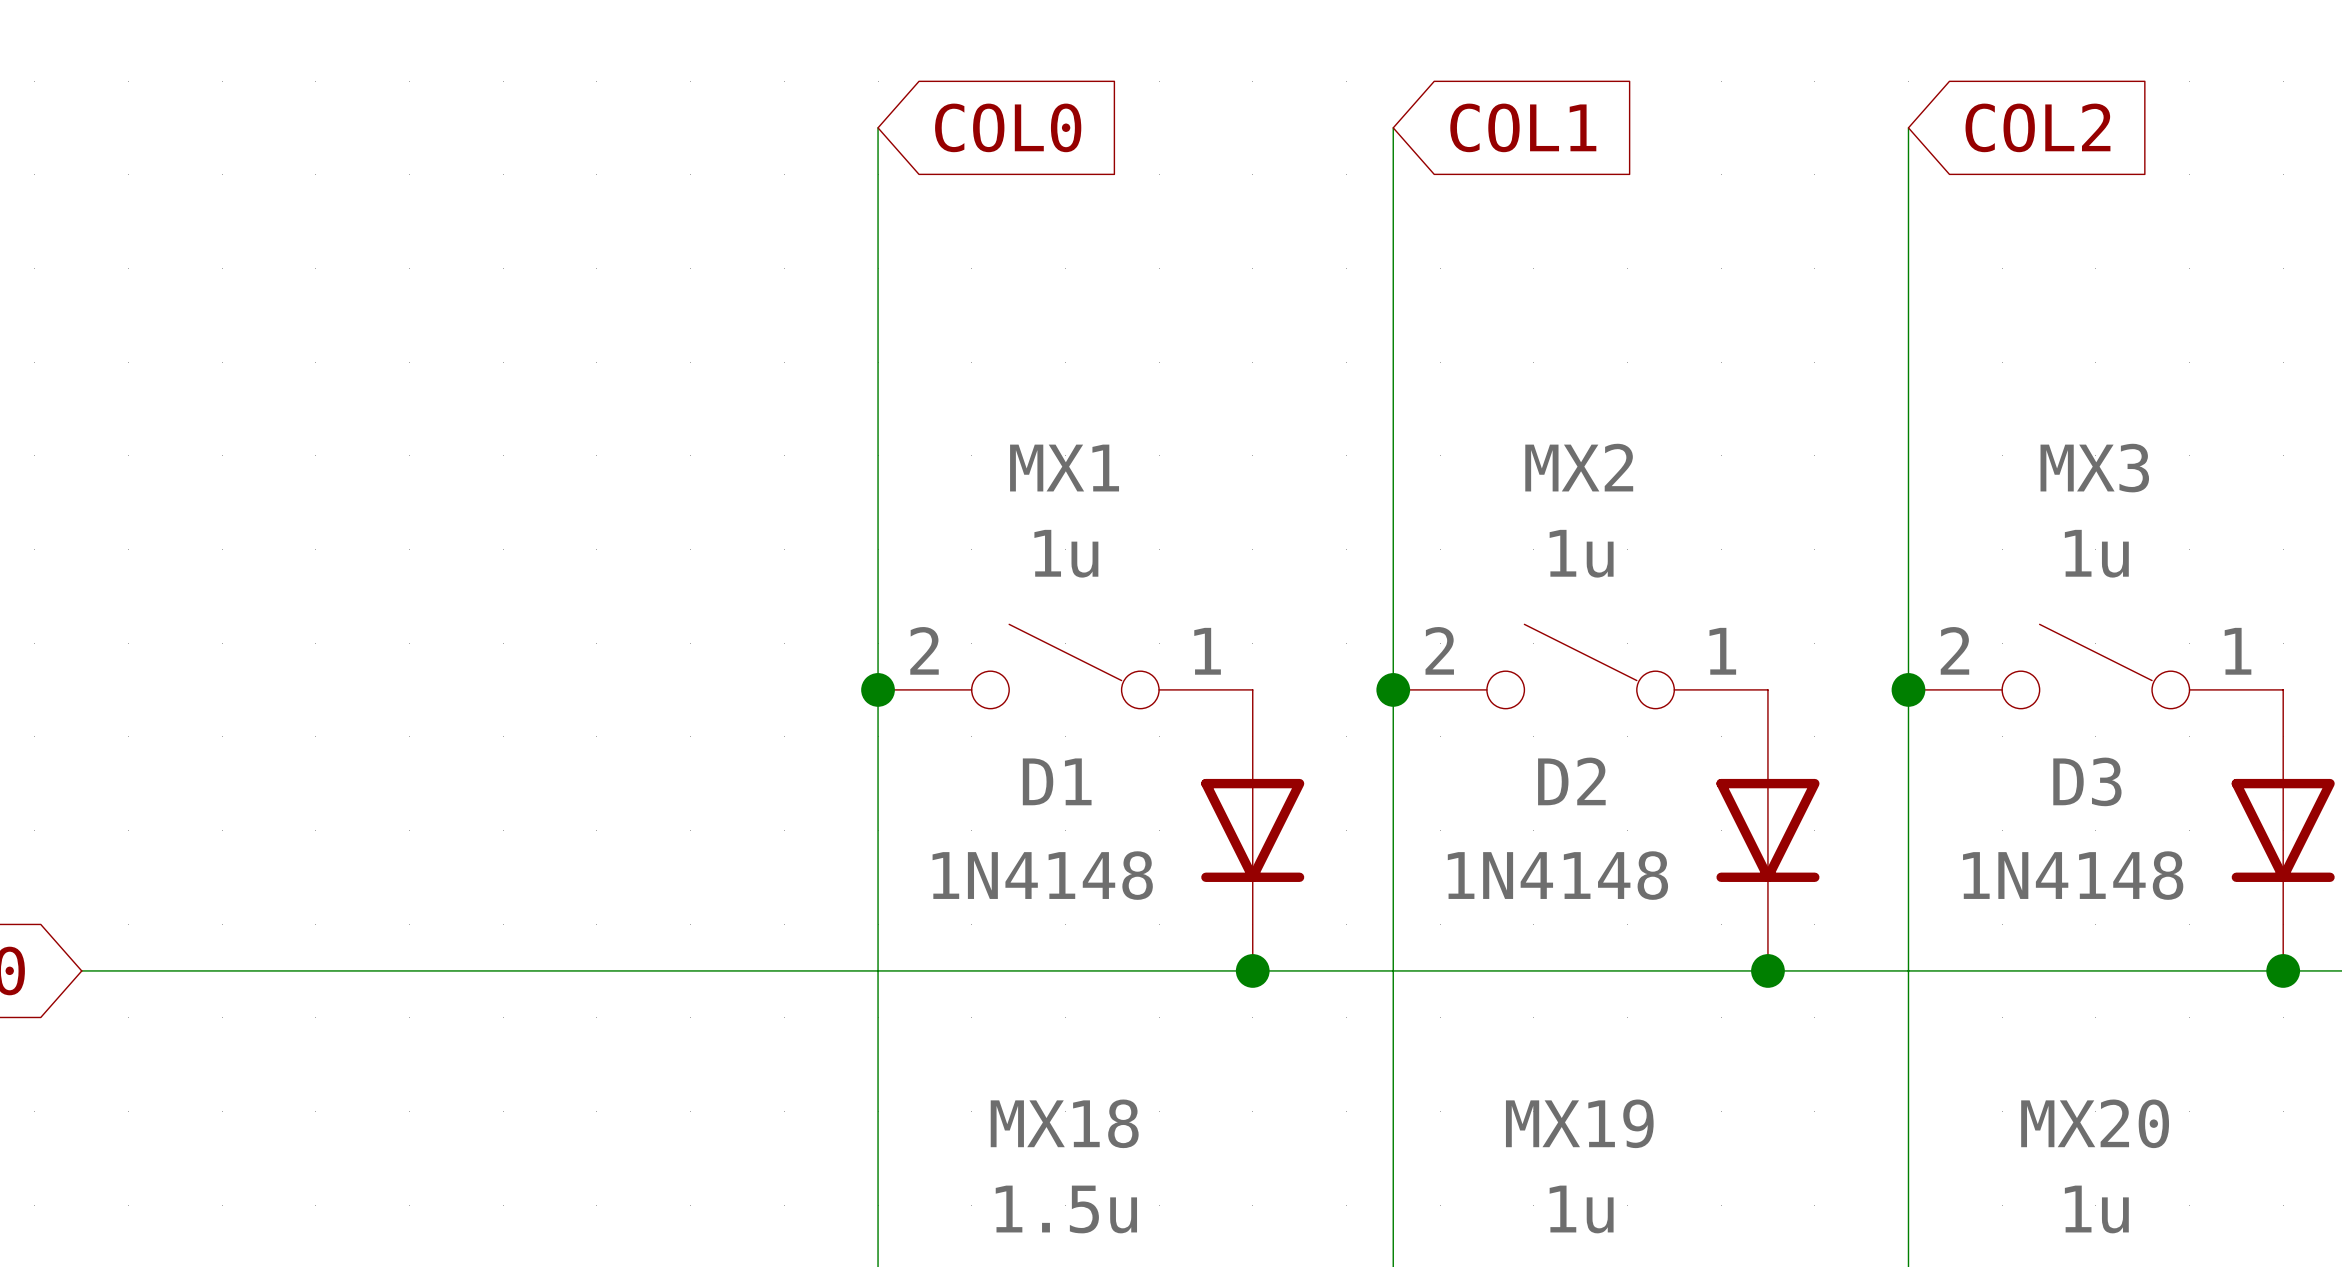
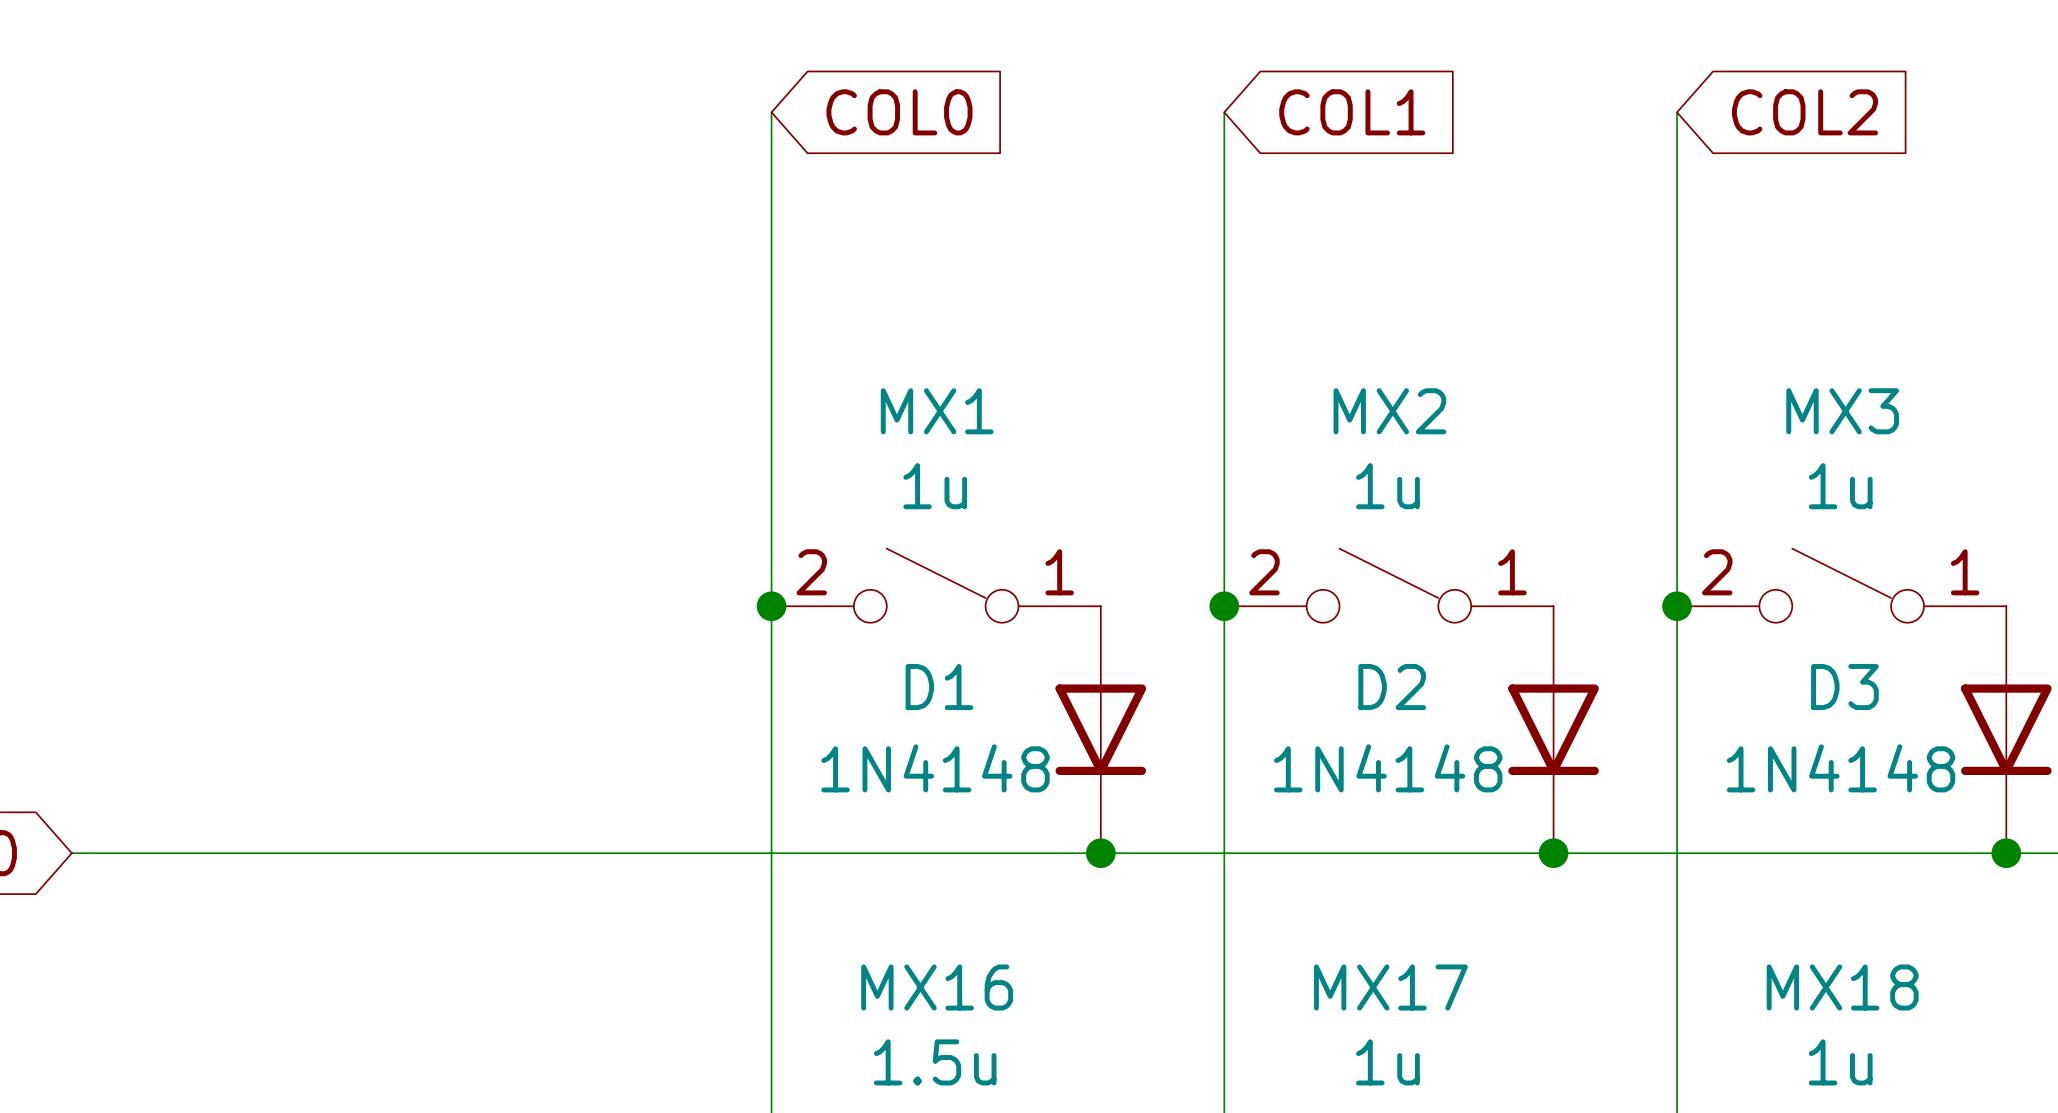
MX18 name: MX18 (1064, 1123) -> MX16 (937, 987)
MX19 name: MX19 (1579, 1123) -> MX17 (1390, 987)
MX20 name: MX20 (2095, 1123) -> MX18 (1842, 987)

